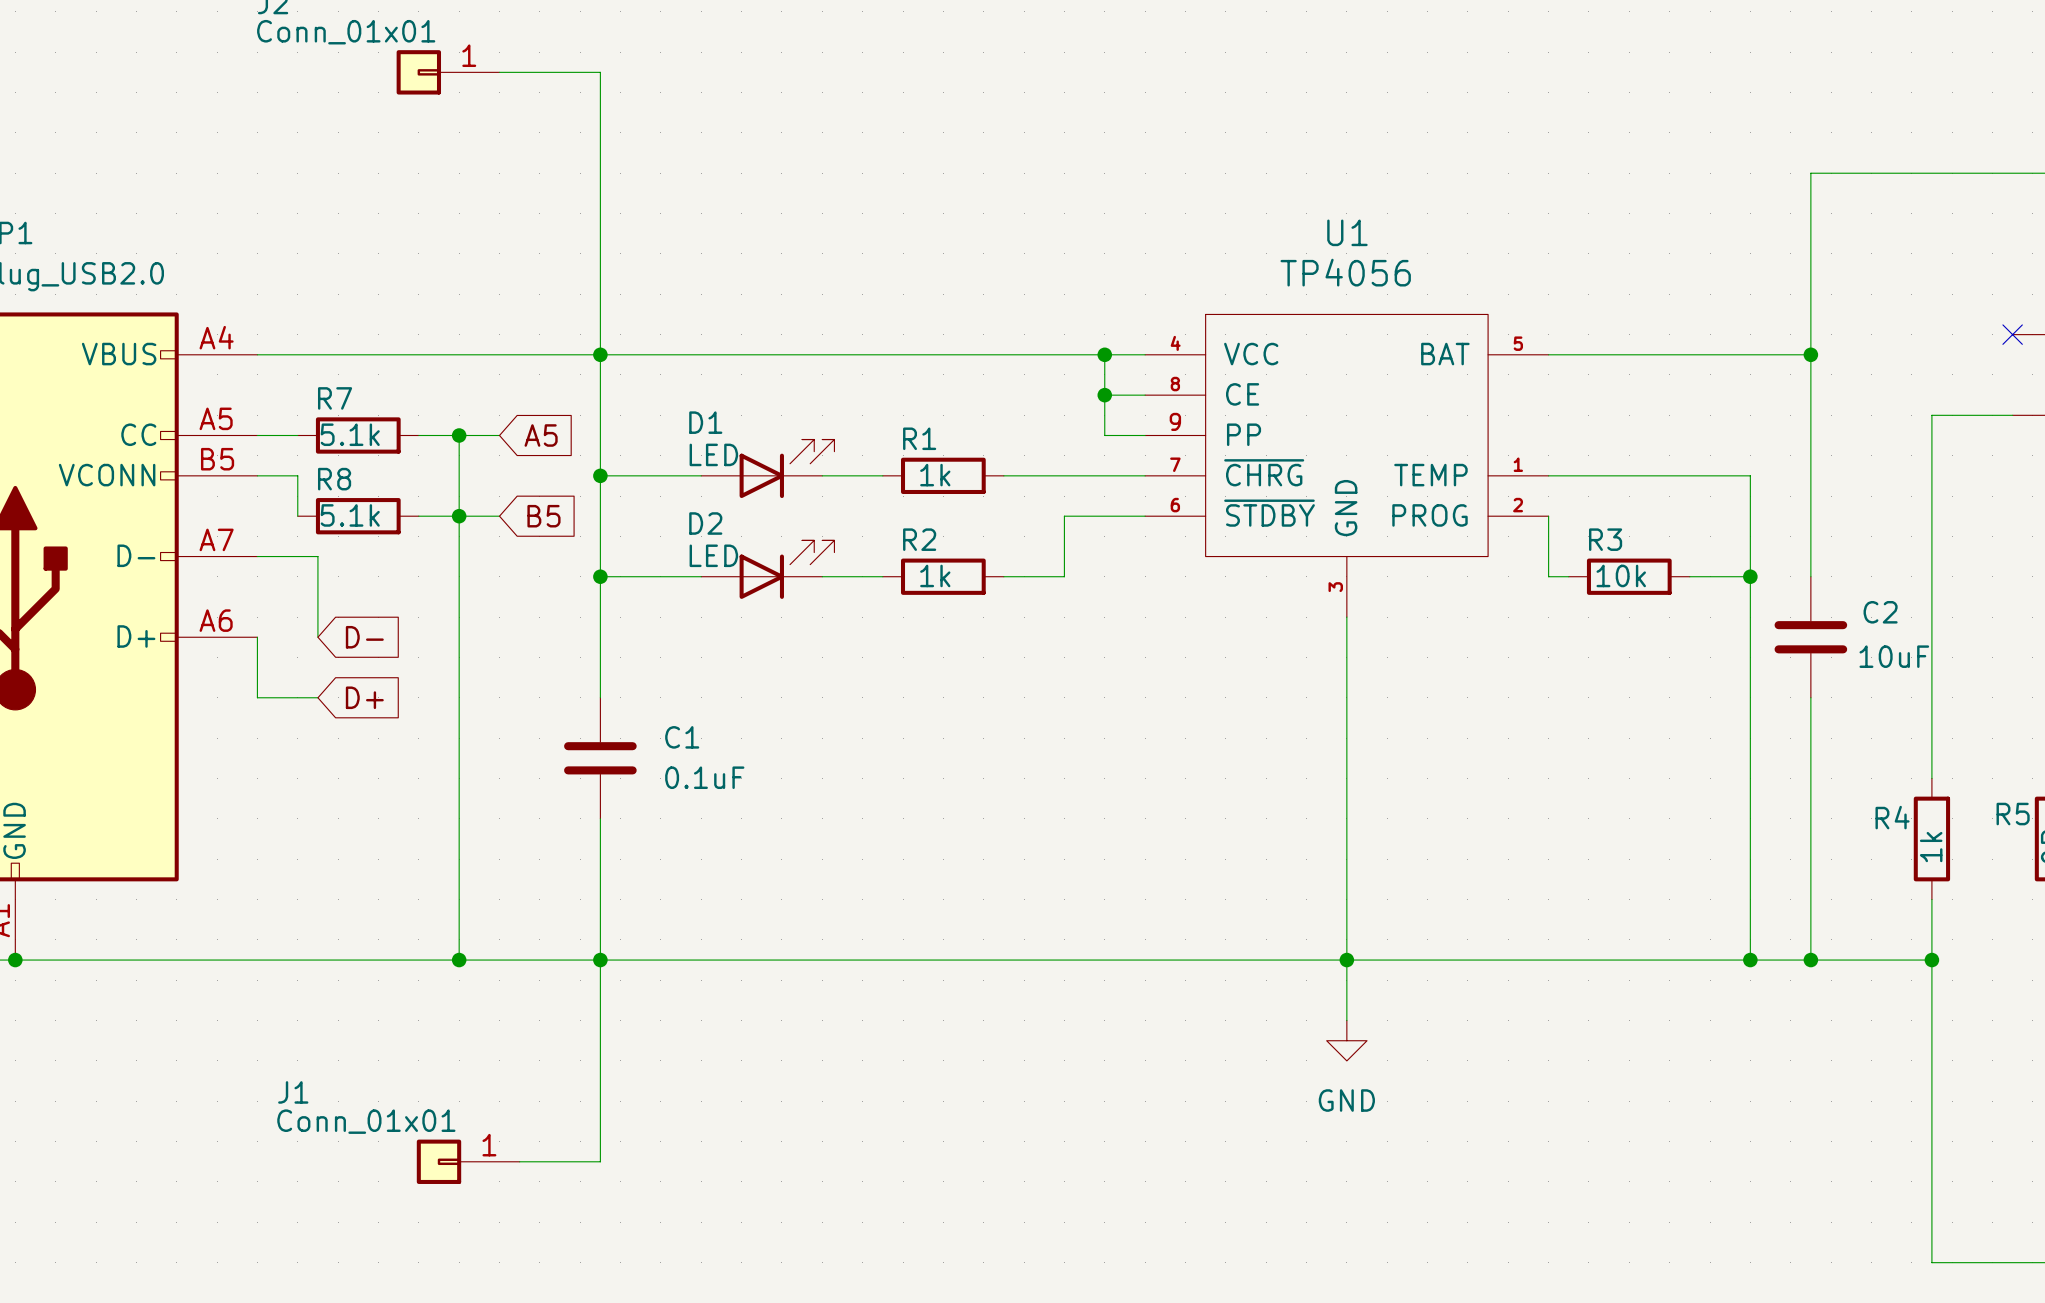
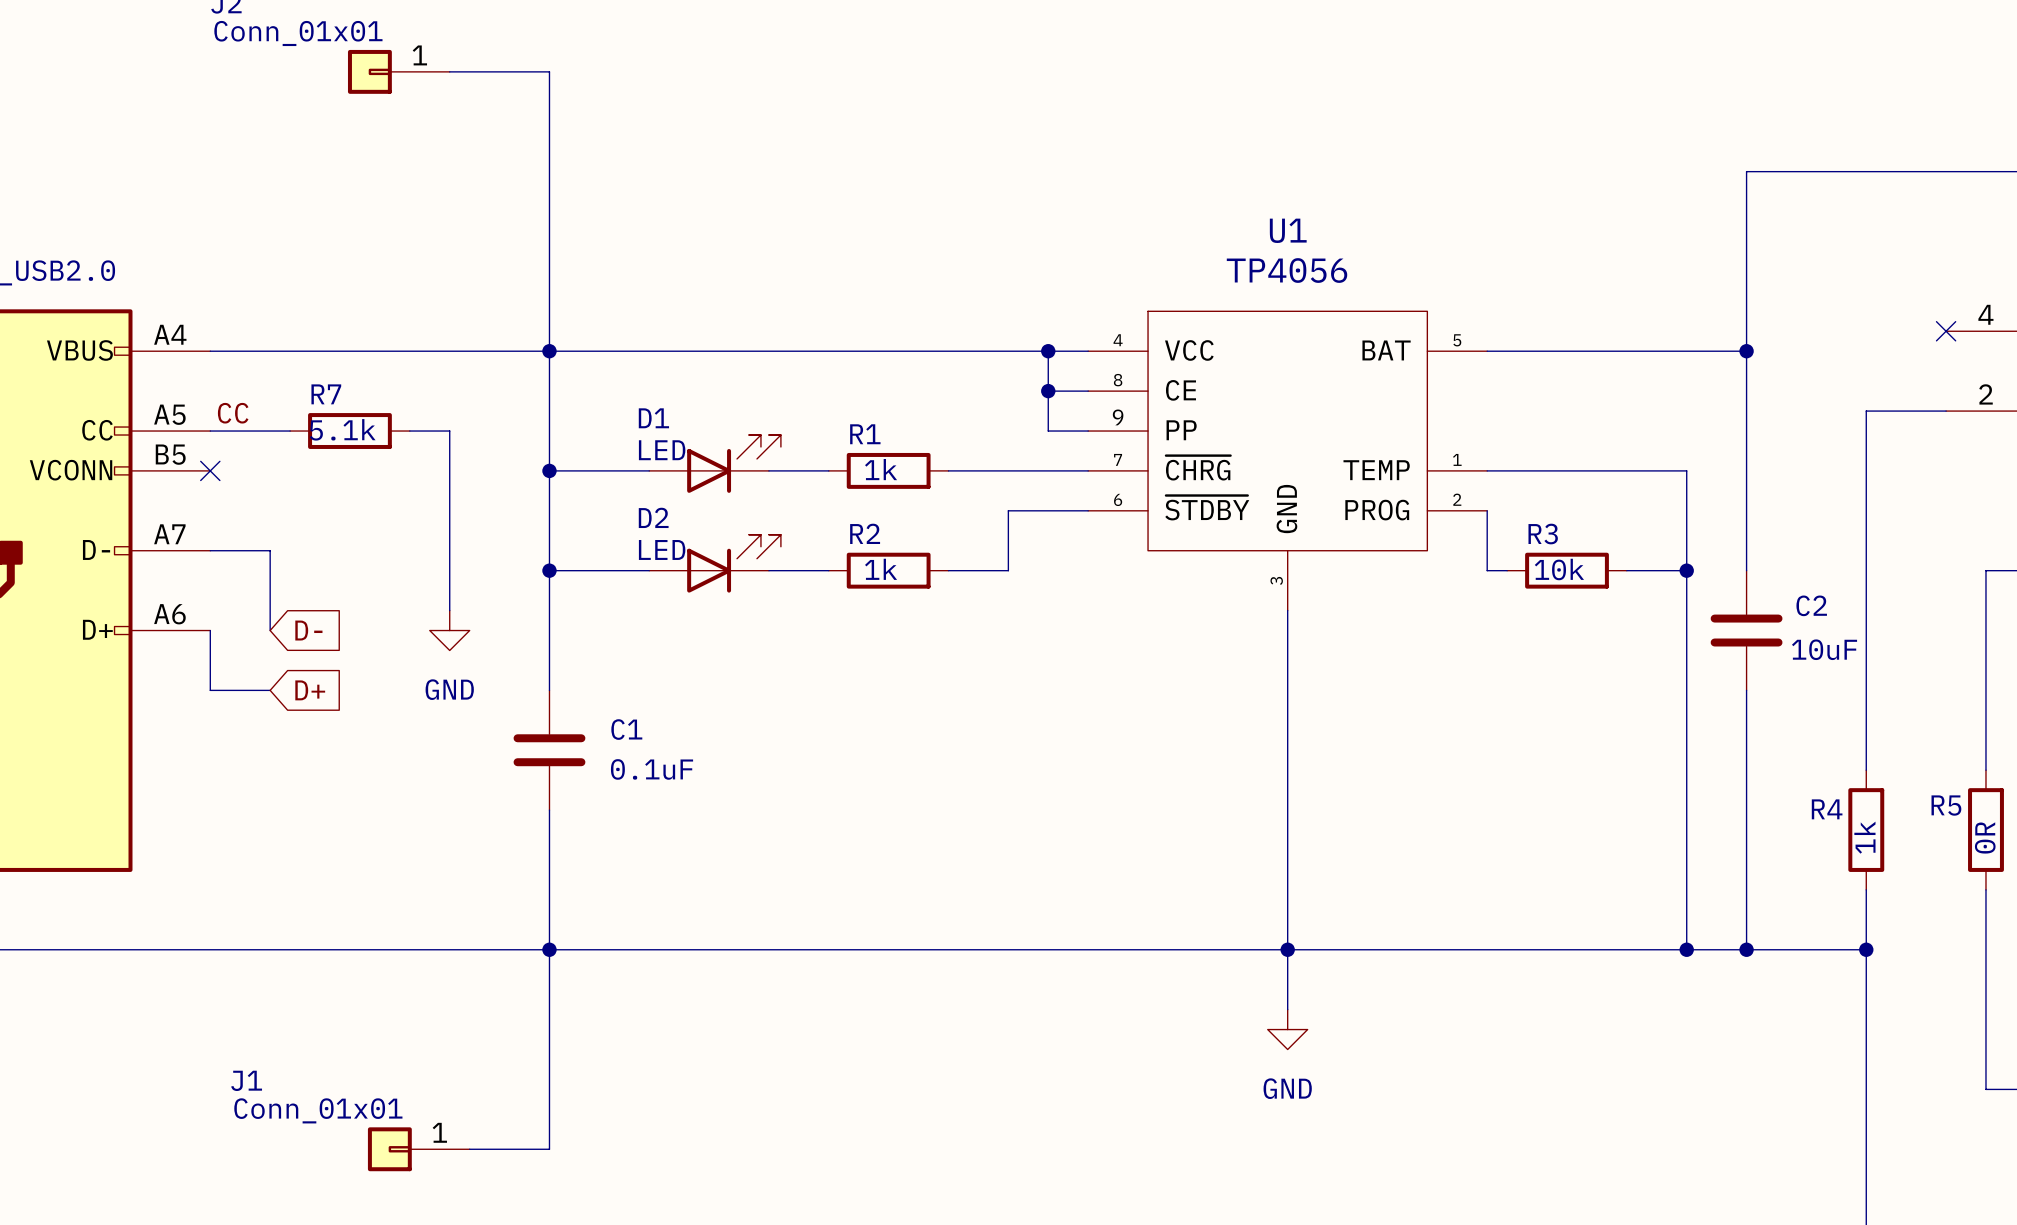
label: none -> CC (233, 413)
R7 position: (358, 435) -> (349, 431)
wire: (418, 435) (459, 435) (459, 960) -> none
junction: (459, 435) -> none
wire: none -> (449, 431) (449, 610)
global label: A5 (541, 435) -> none
wire: (257, 475) (297, 475) (297, 516) -> none
no-connect mark: none -> (210, 470)
R8: 5.1k (358, 516) -> none
wire: (418, 516) (499, 516) -> none
junction: (459, 516) -> none
global label: B5 (543, 516) -> none
power symbol: none -> GND (449, 630)
junction: (459, 960) -> none

